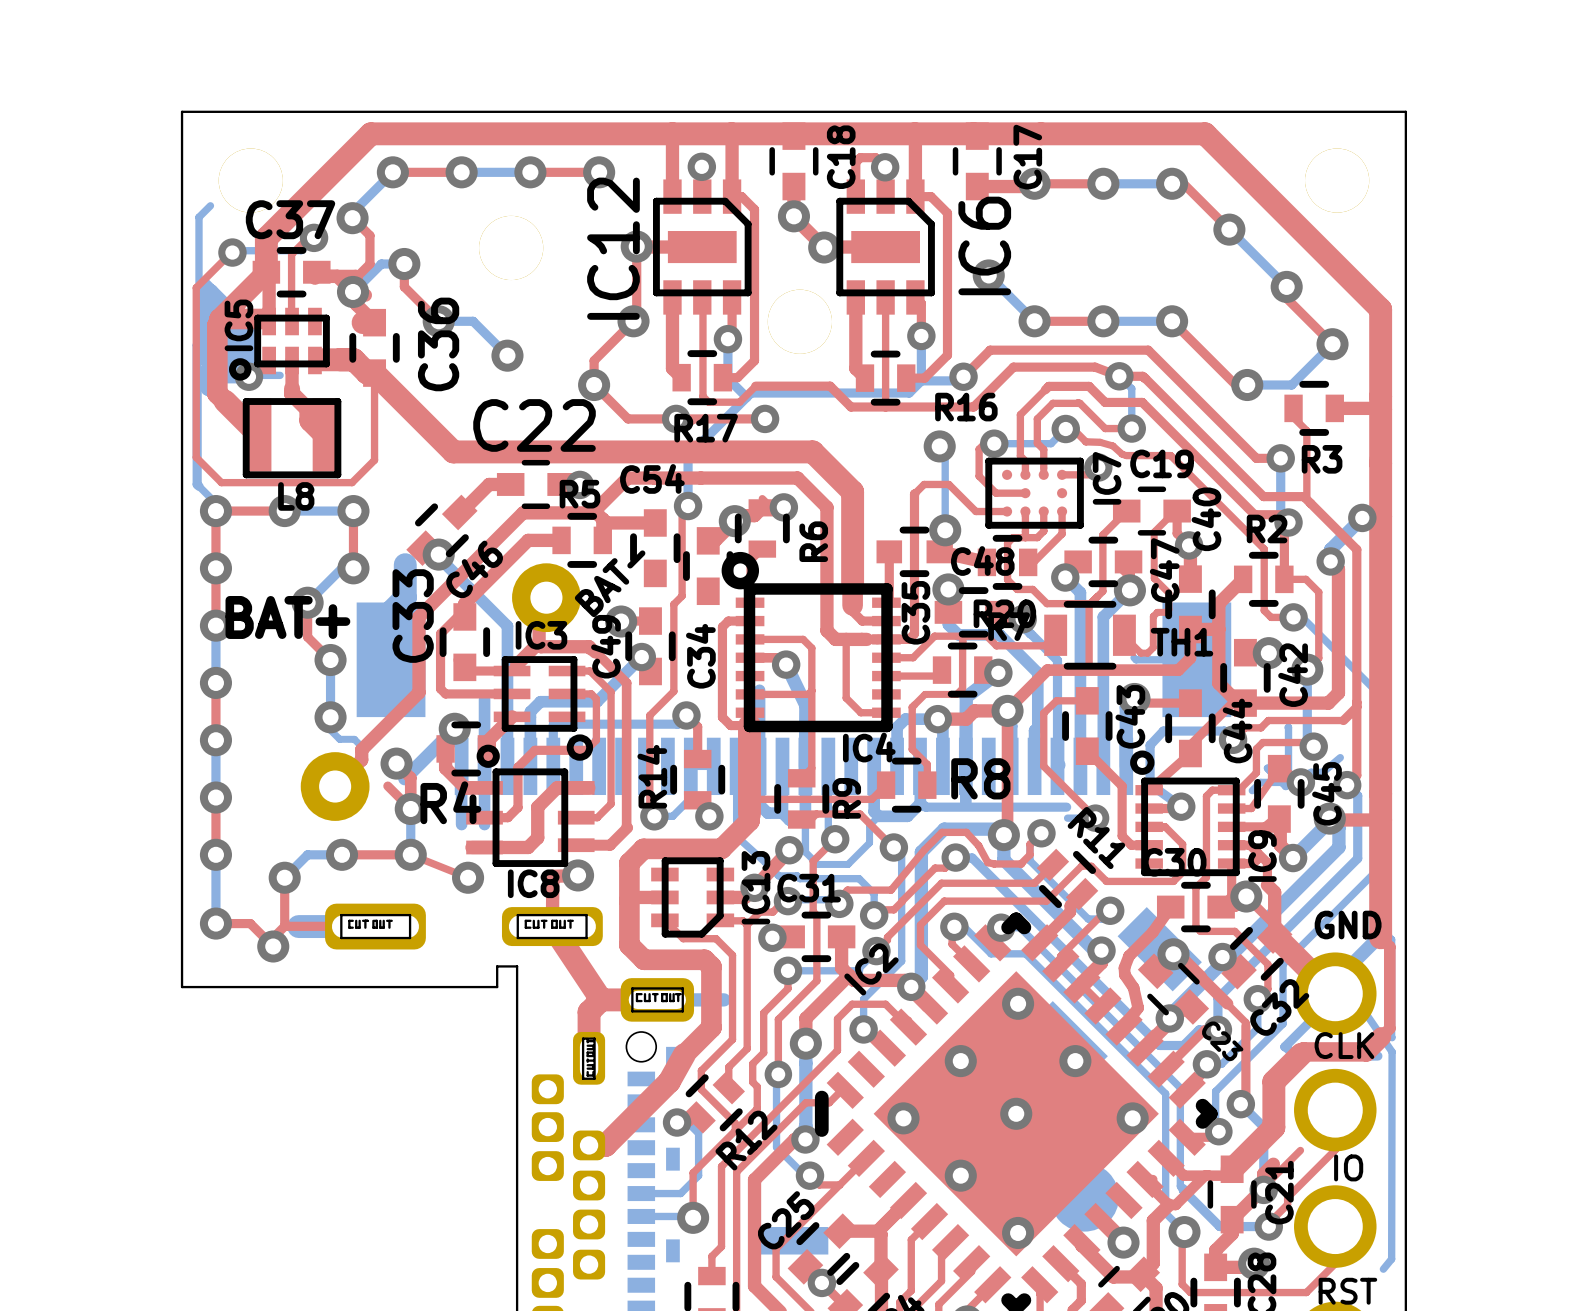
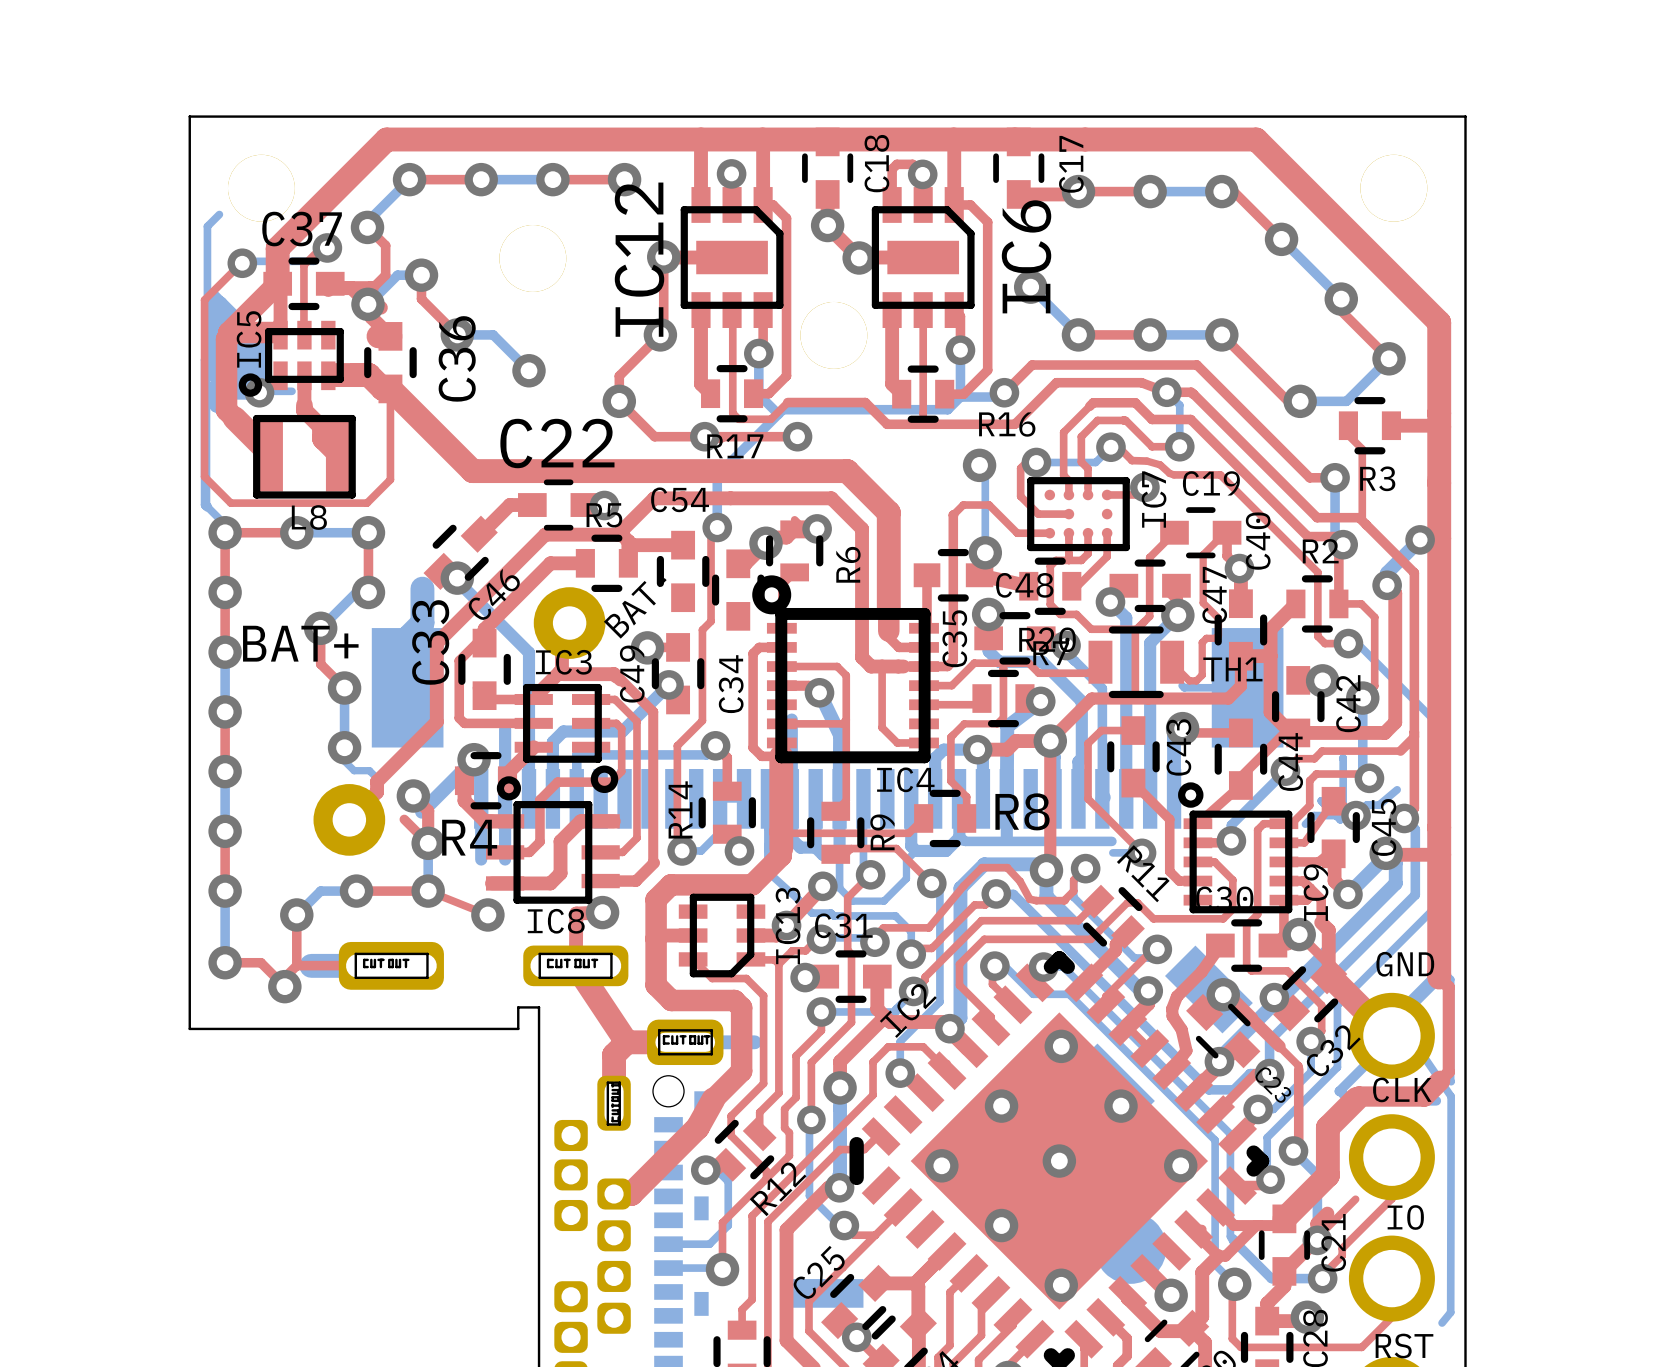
bottom track: (1229, 736) (1224, 731) (1163, 731) (1150, 745) (1150, 784) (1181, 806) -> (1285, 771) (1231, 825) (1231, 840)

